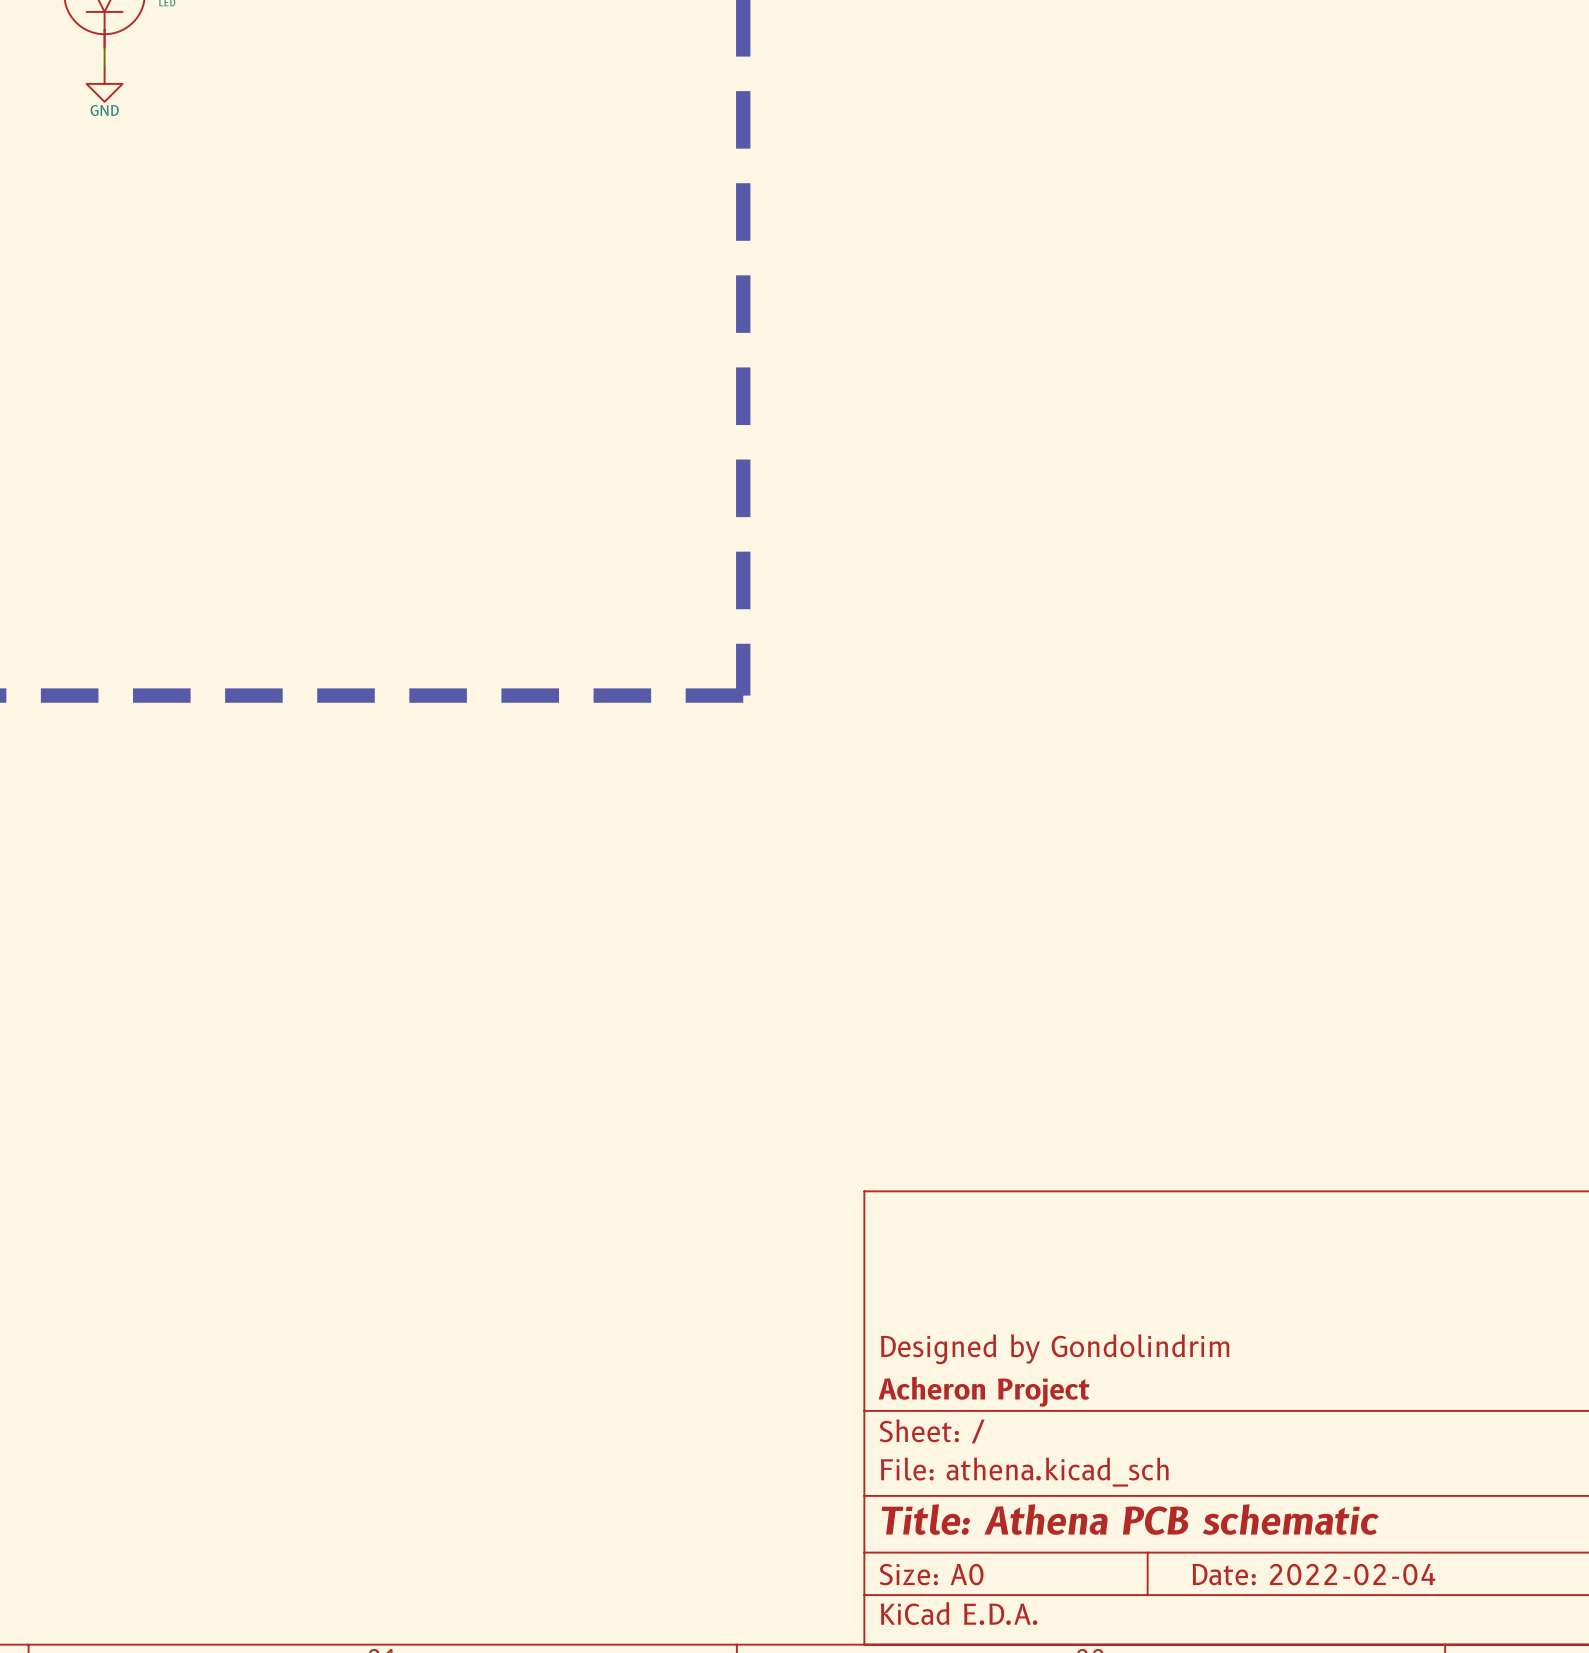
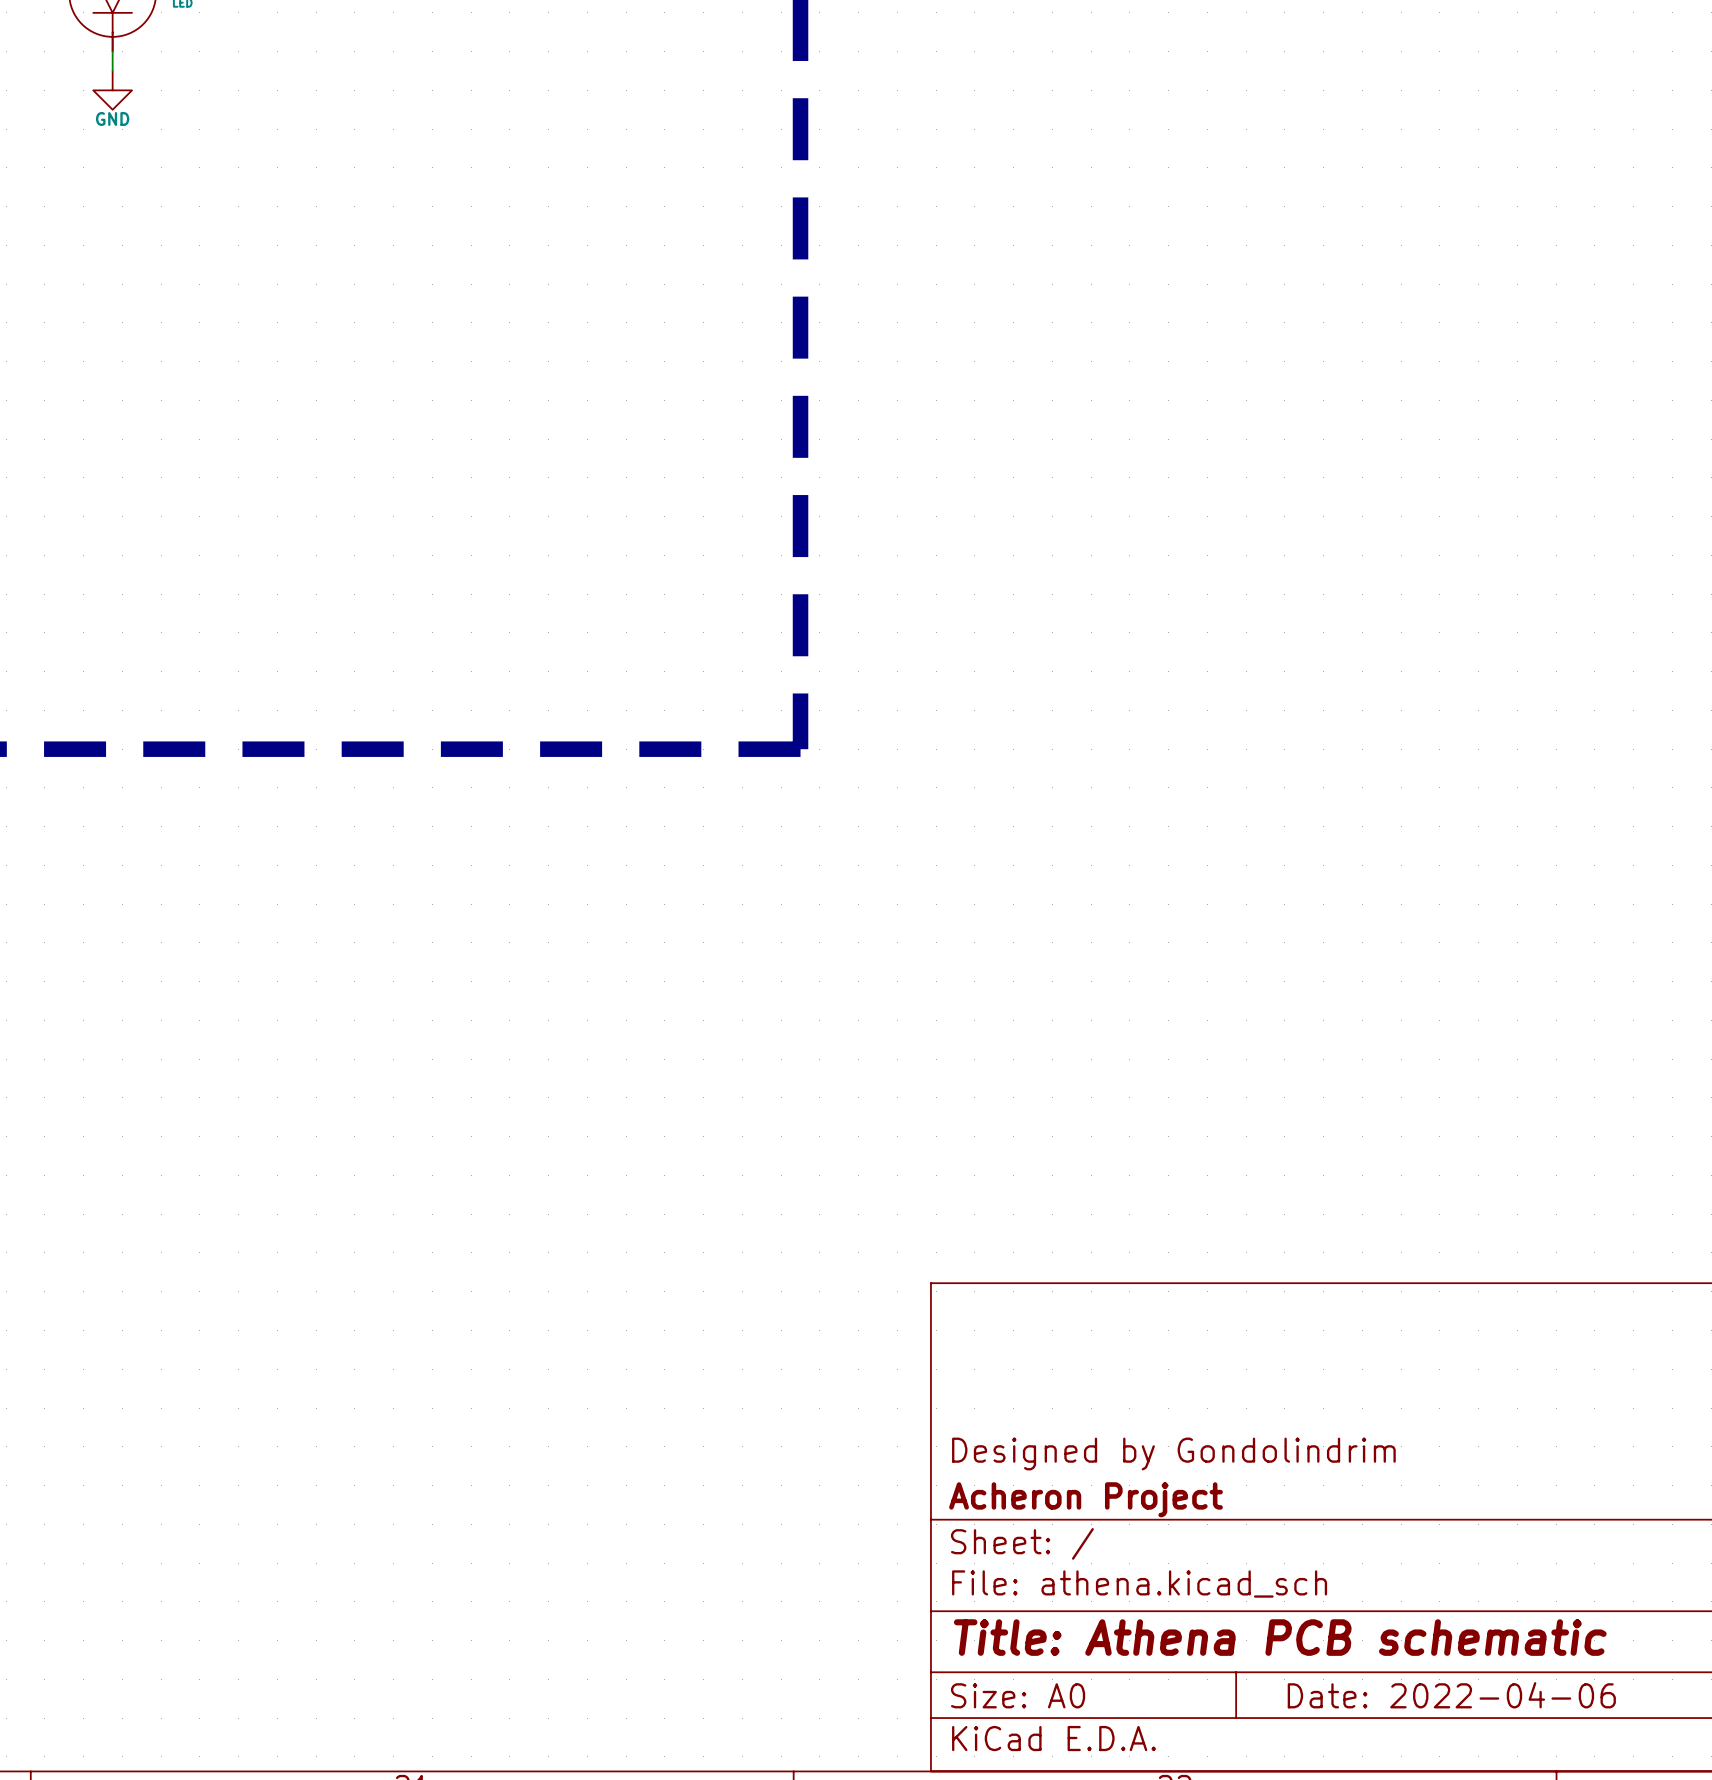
title block: Date: 2022-02-04 (1314, 1574) -> Date: 2022-04-06 (1451, 1695)

